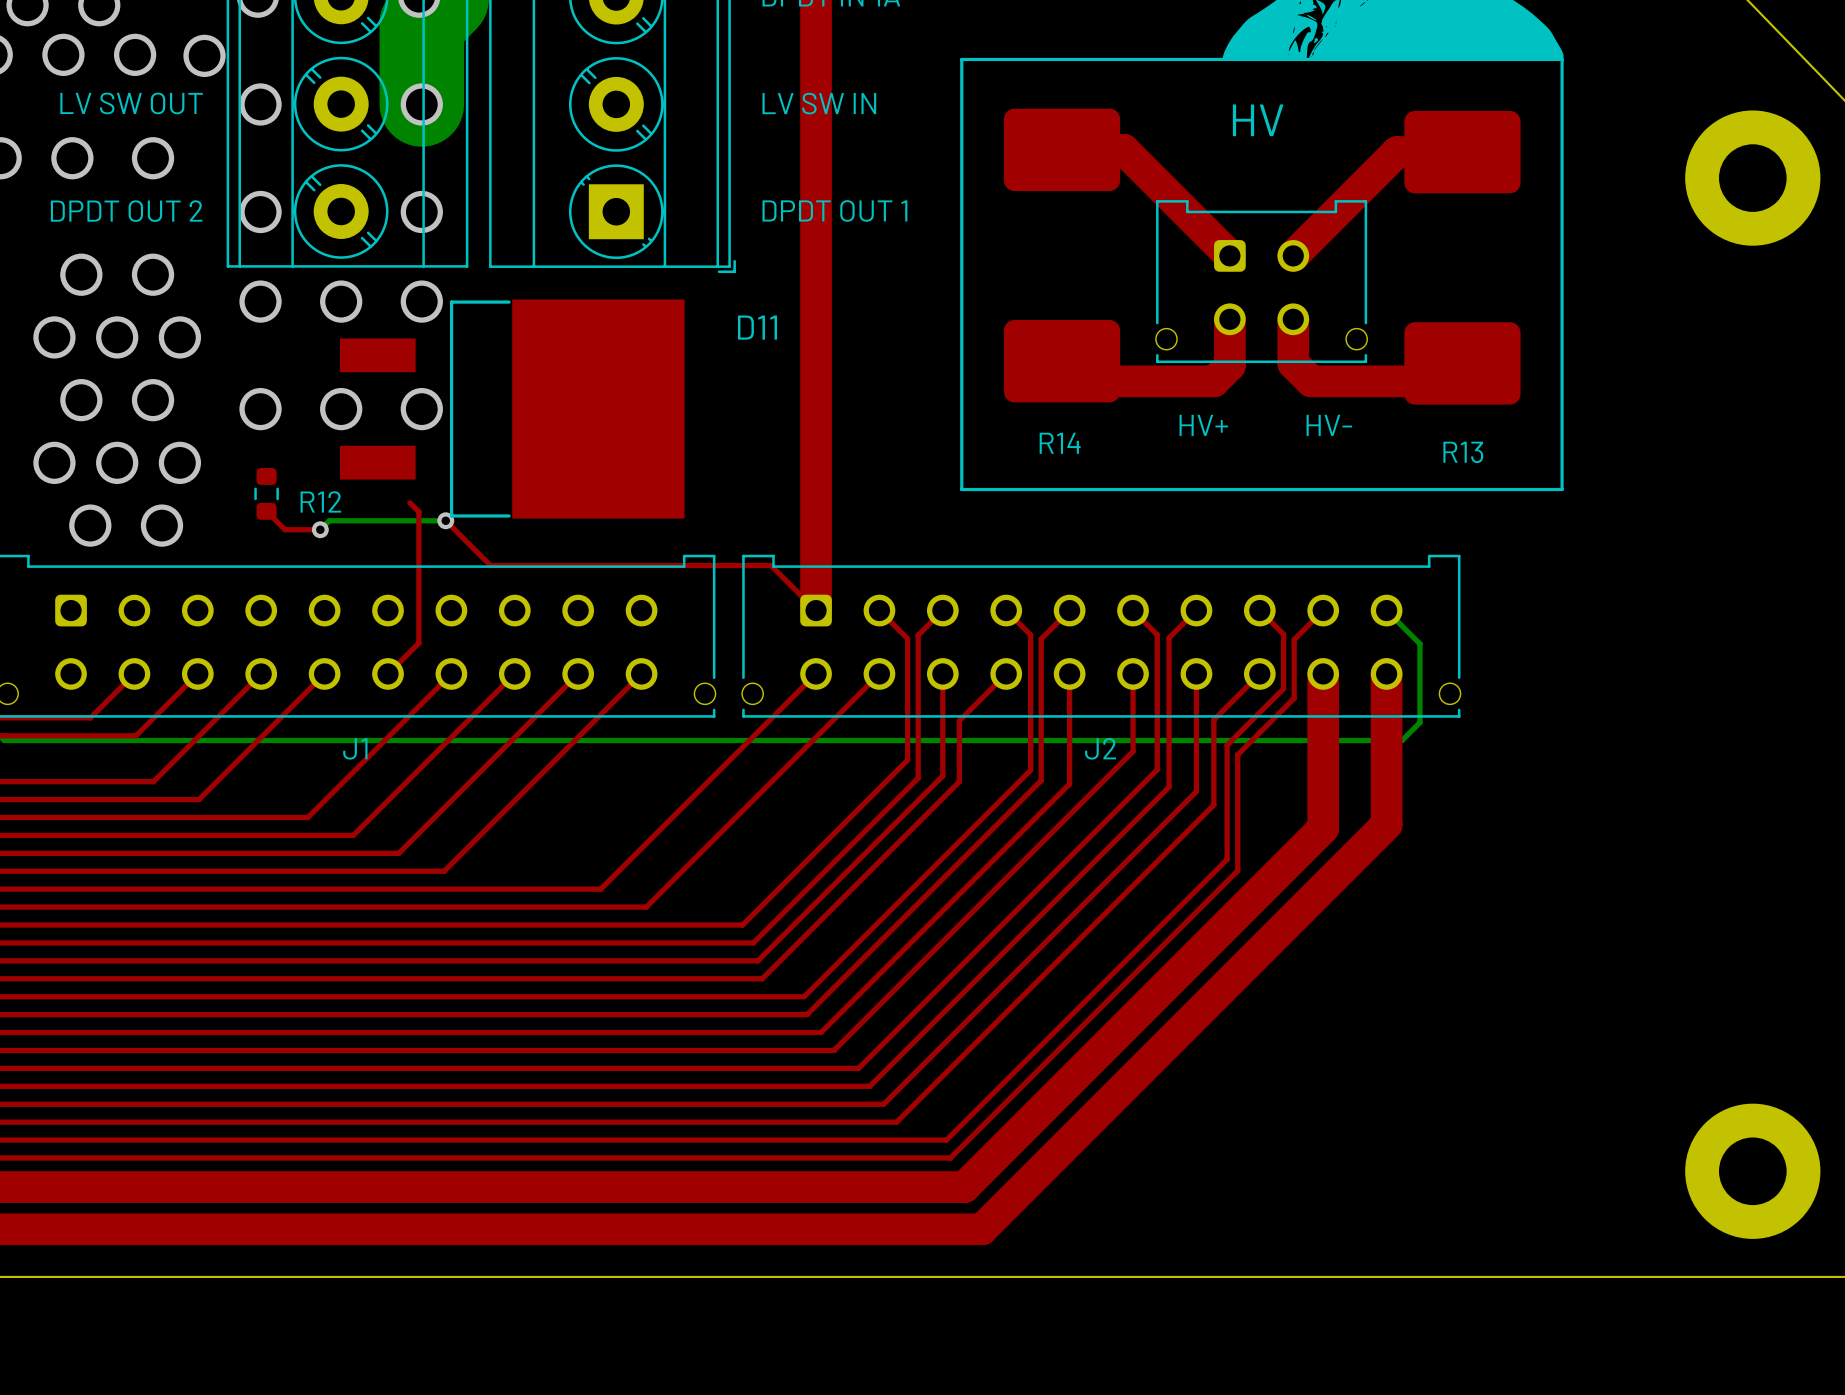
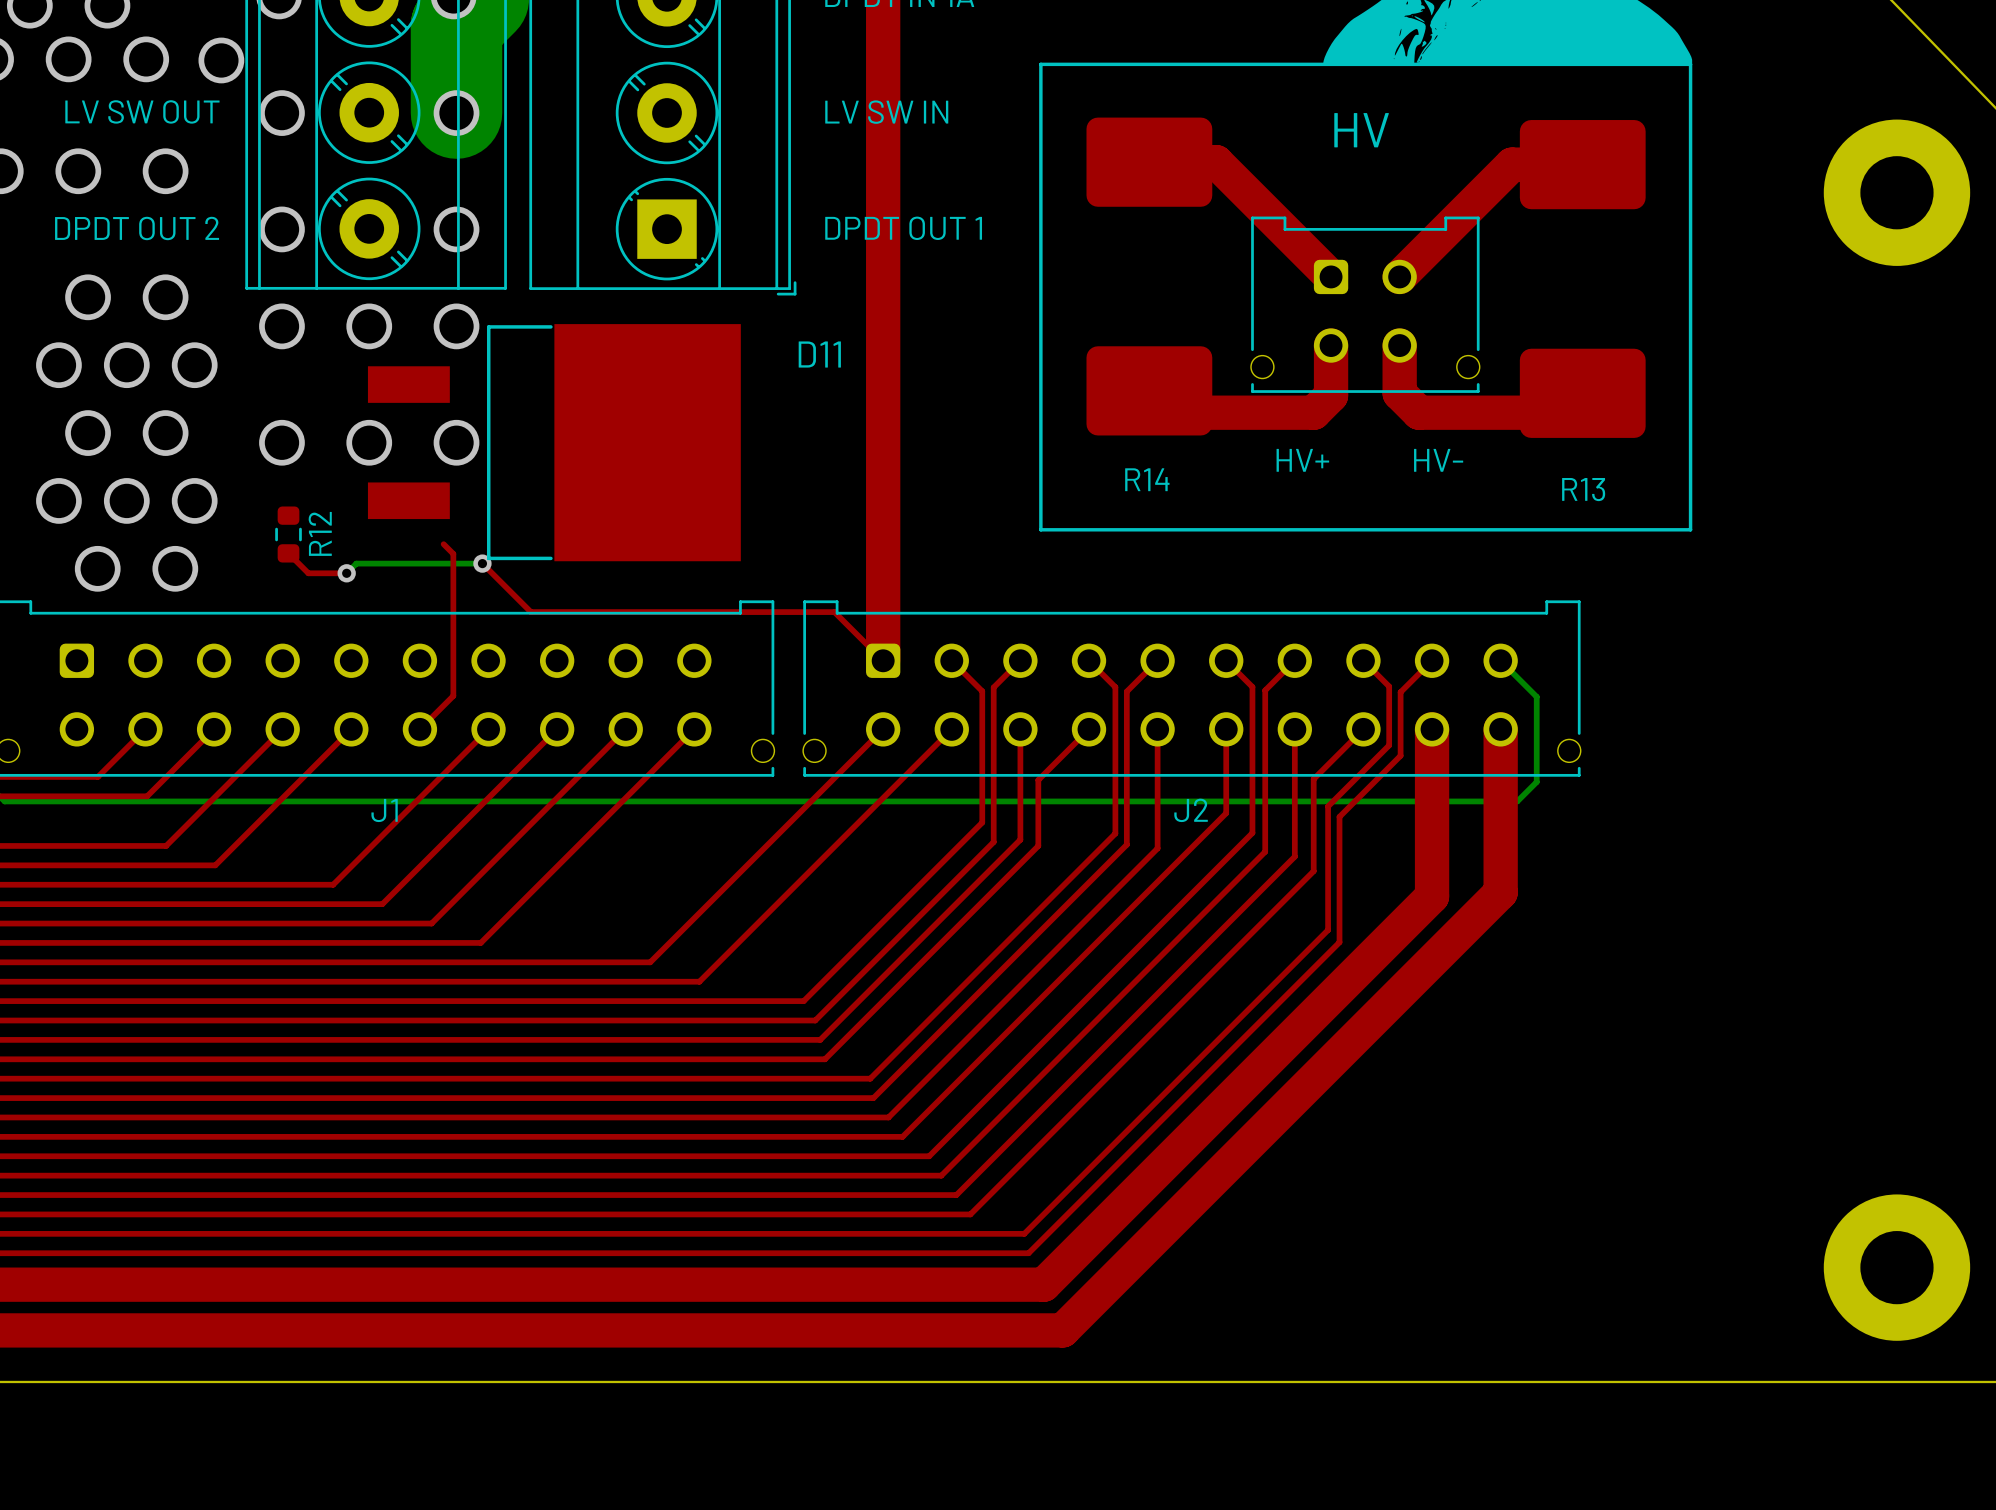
R12 name rotation: 0° (320, 501) -> 90° counterclockwise (320, 533)

